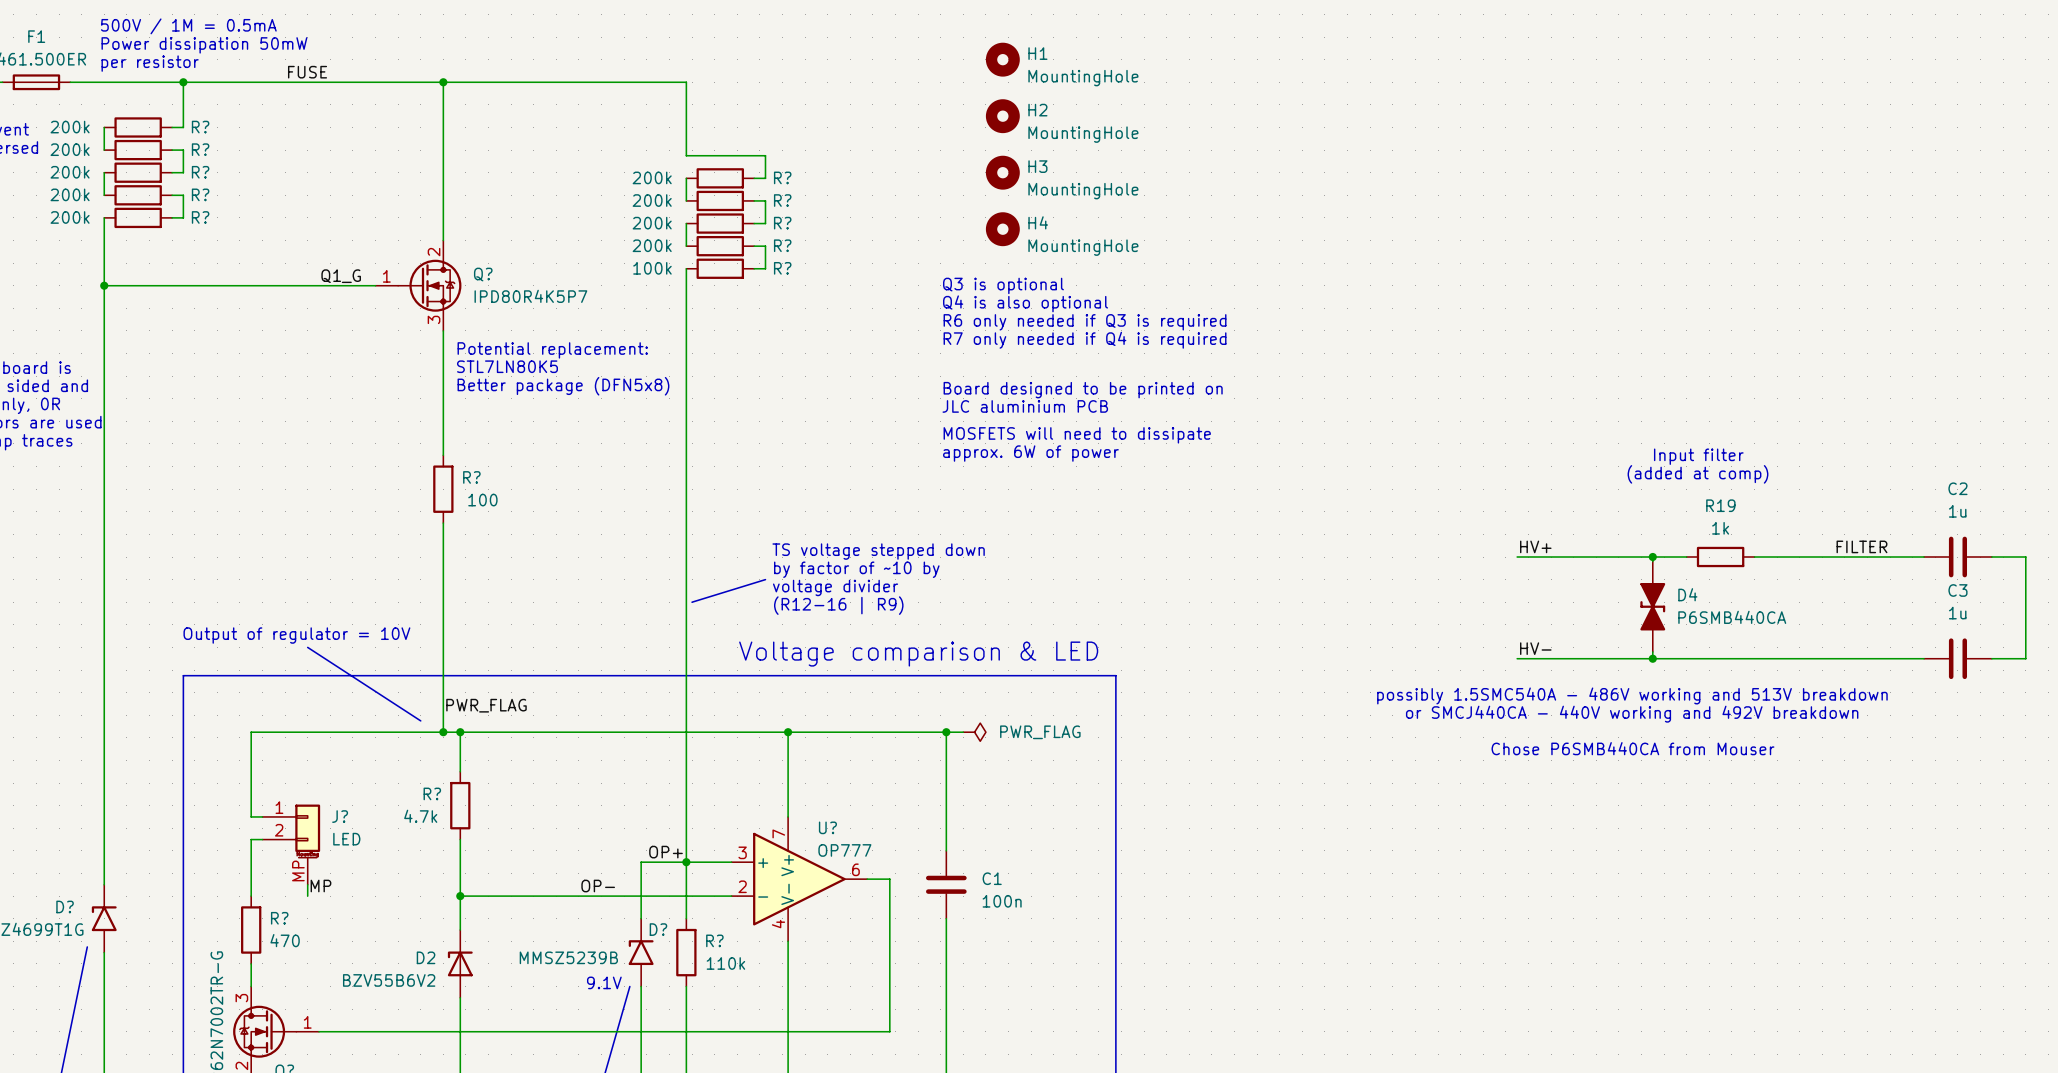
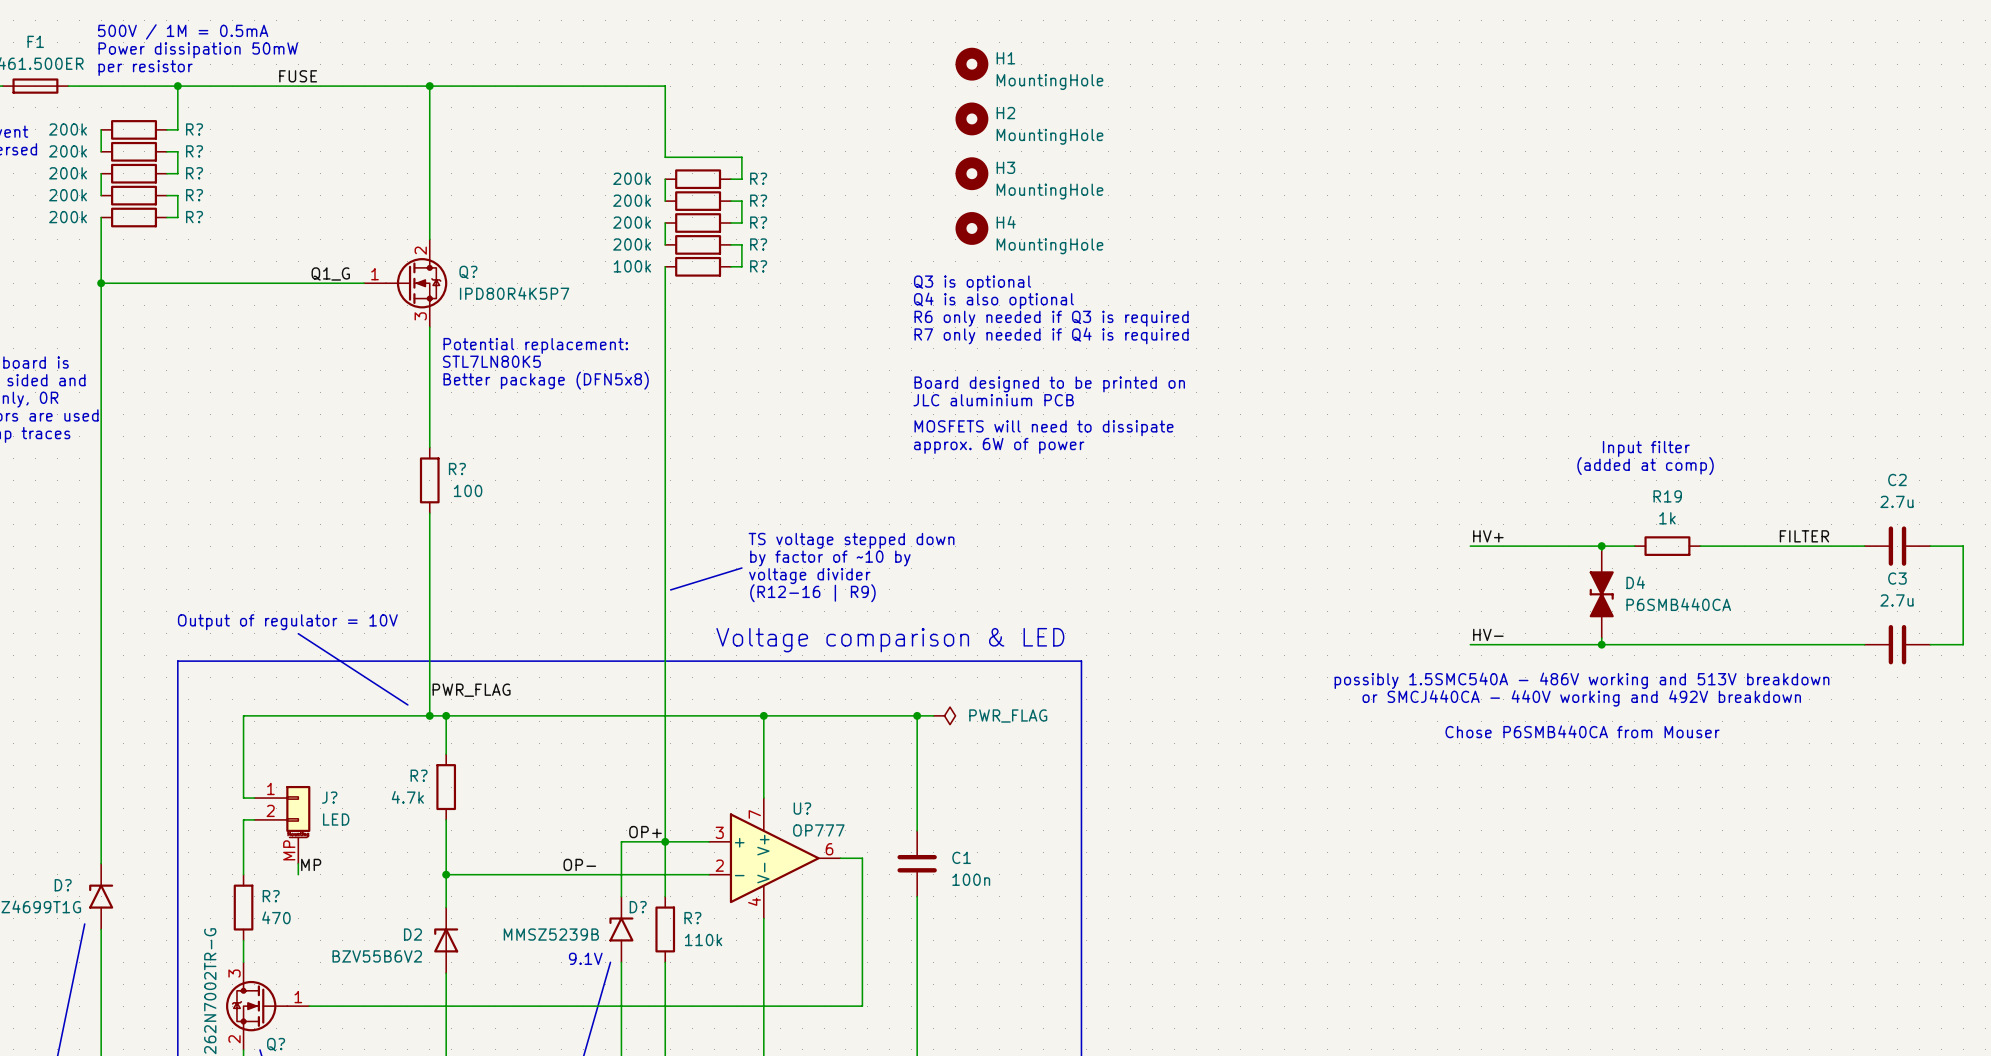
C2 value: 1u (1957, 511) -> 2.7u (1896, 501)
C3 value: 1u (1957, 613) -> 2.7u (1896, 600)

